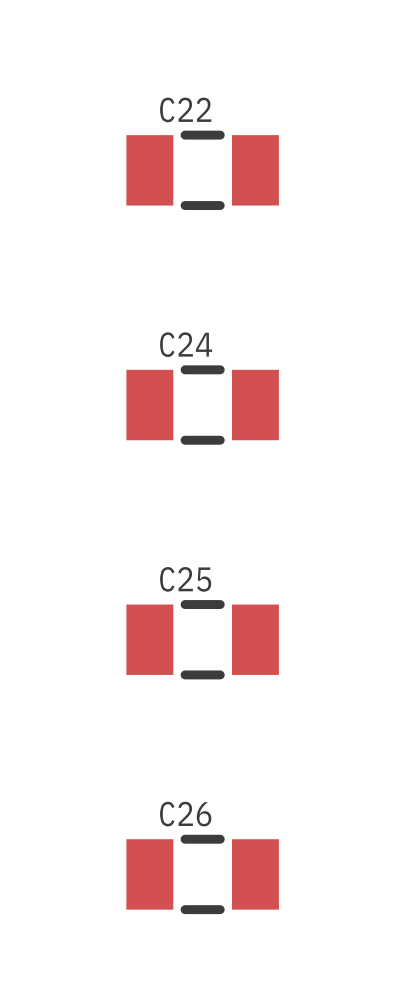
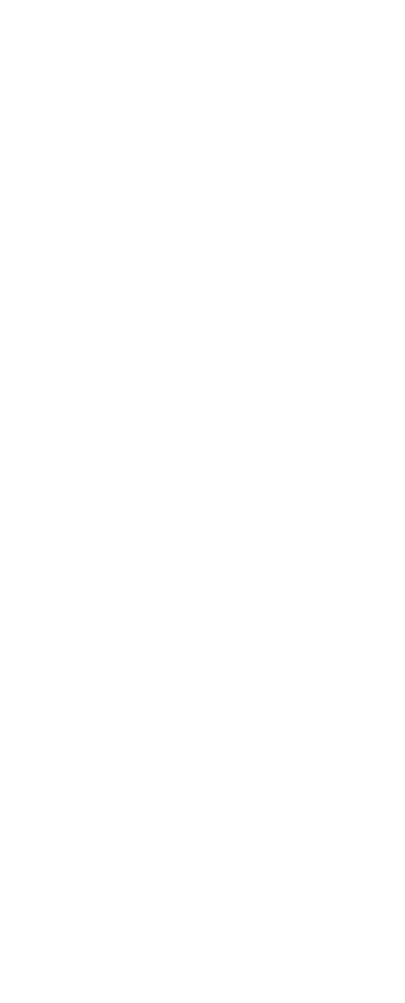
C22: (202, 170) -> none
C24: (202, 405) -> none
C25: (202, 639) -> none
C26: (202, 874) -> none

